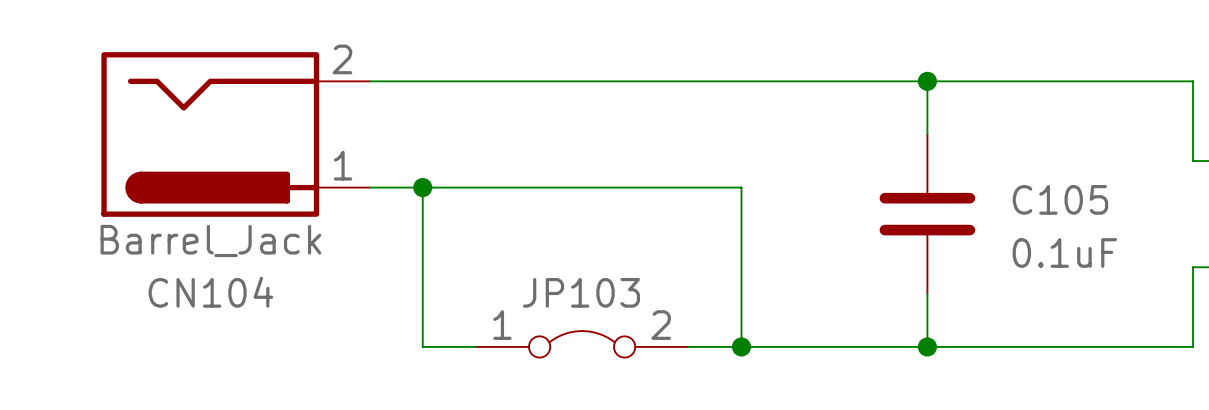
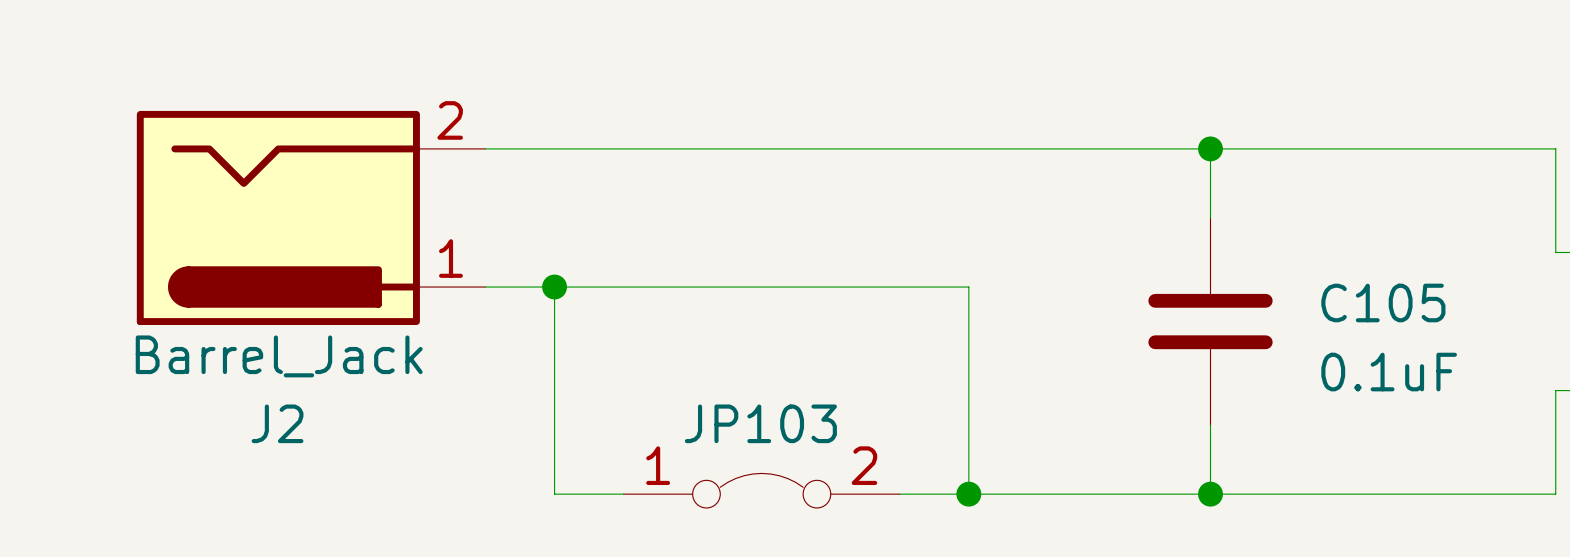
CN104 name: CN104 (210, 292) -> J2 (277, 423)

